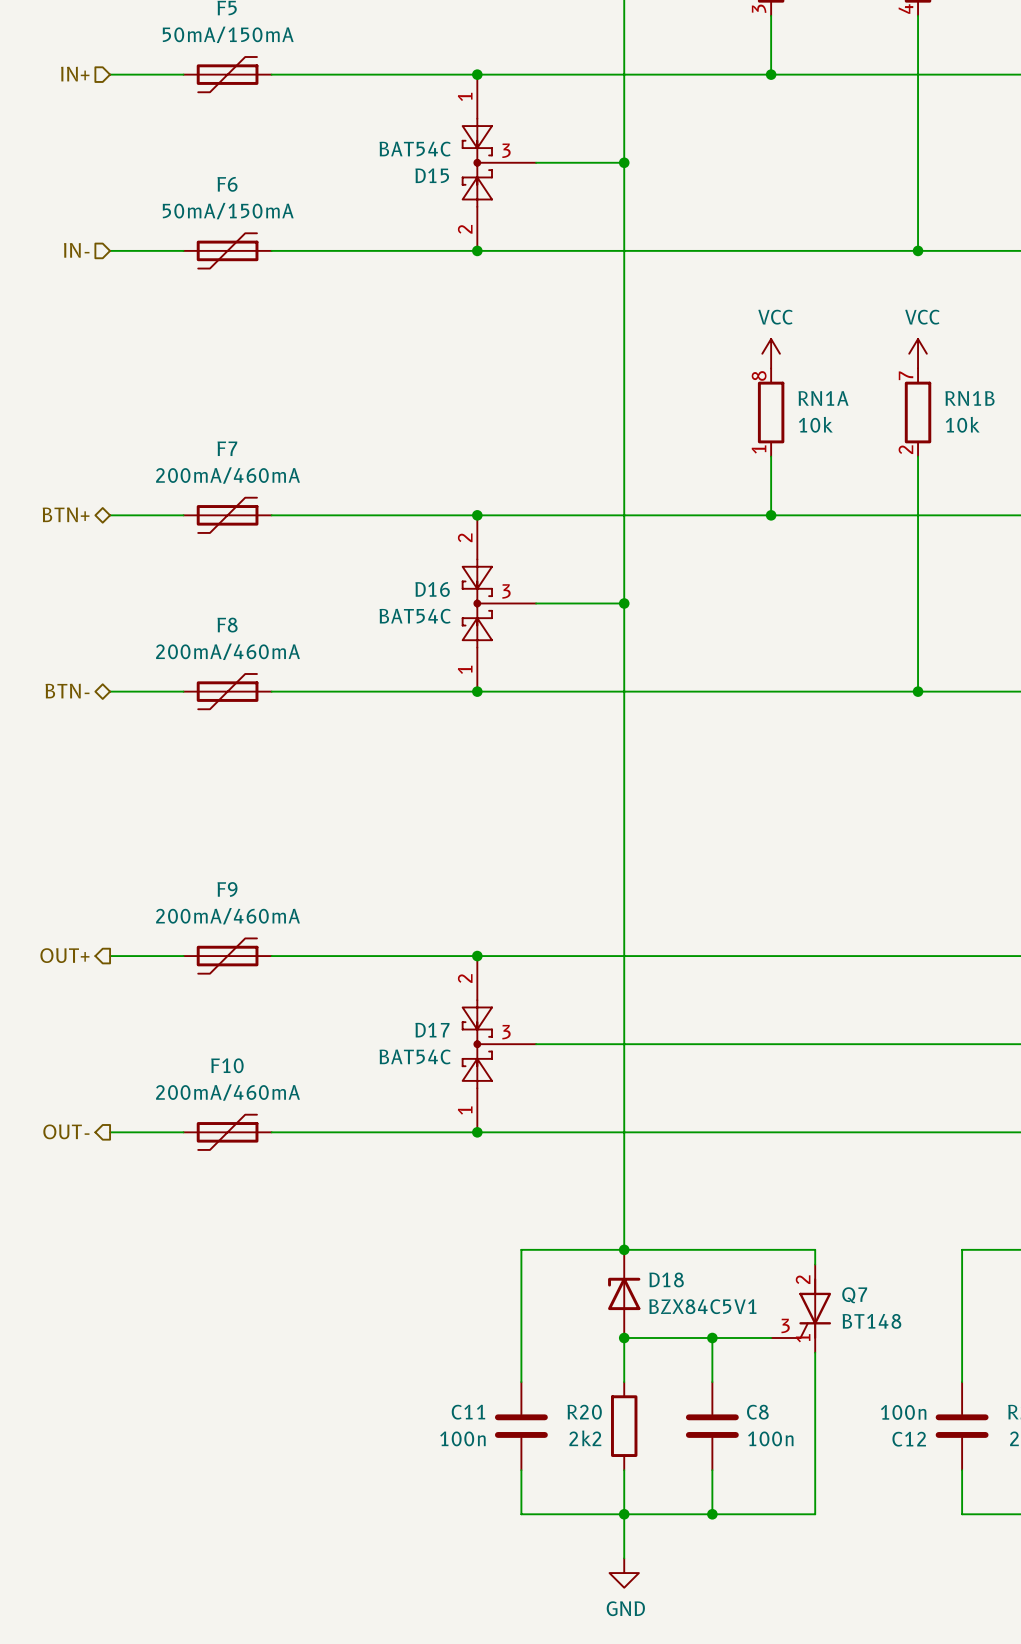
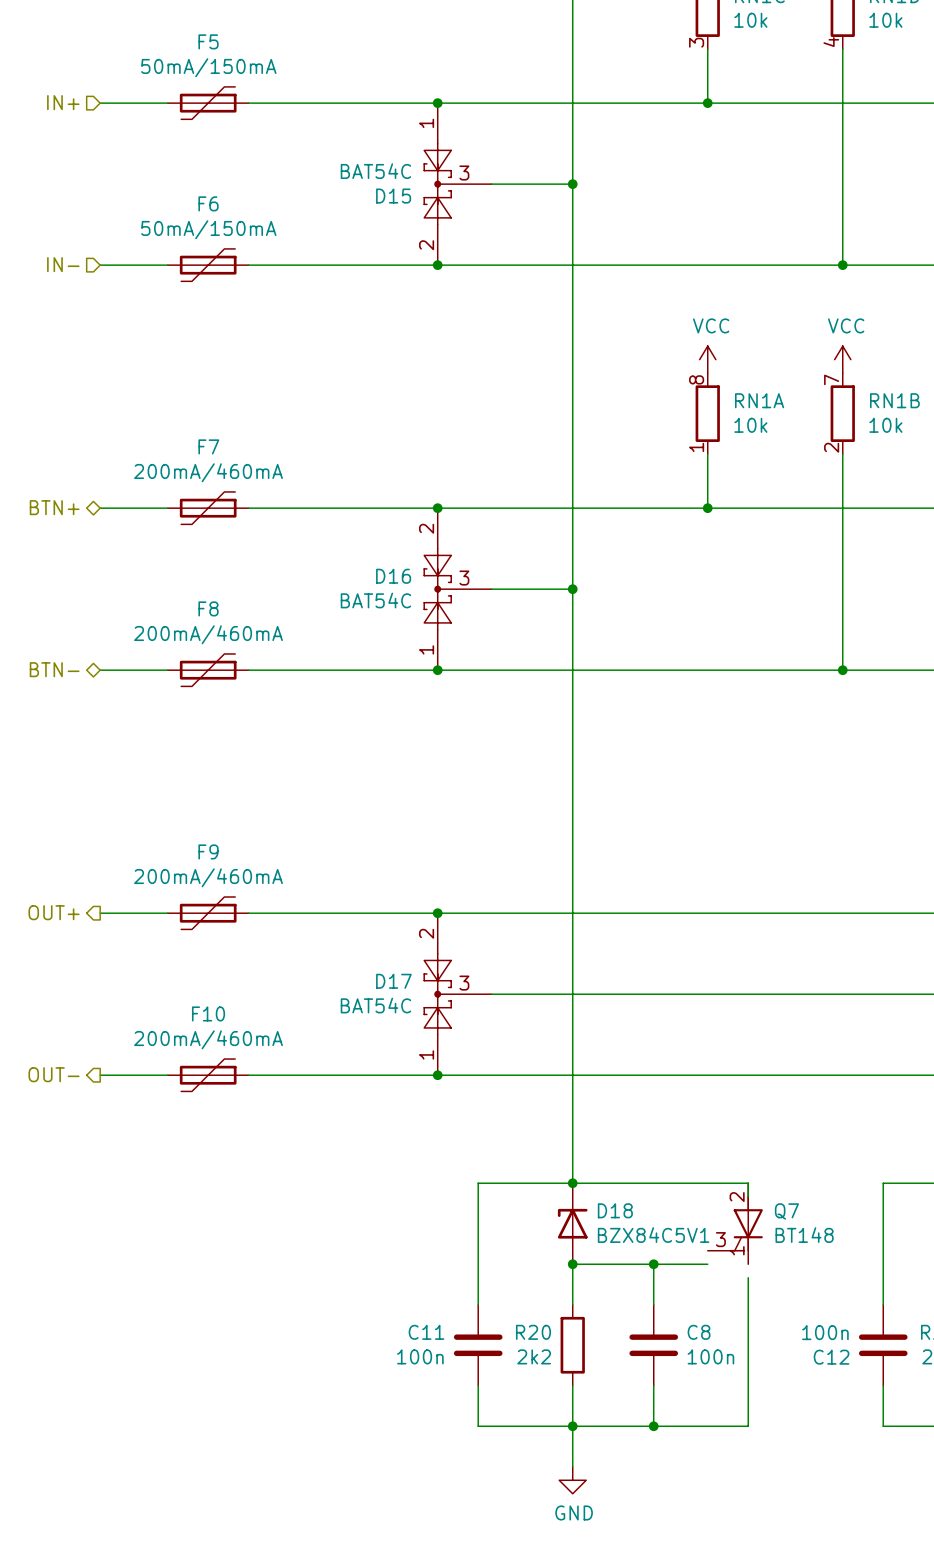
Q7 position: (801, 1308) -> (735, 1223)

